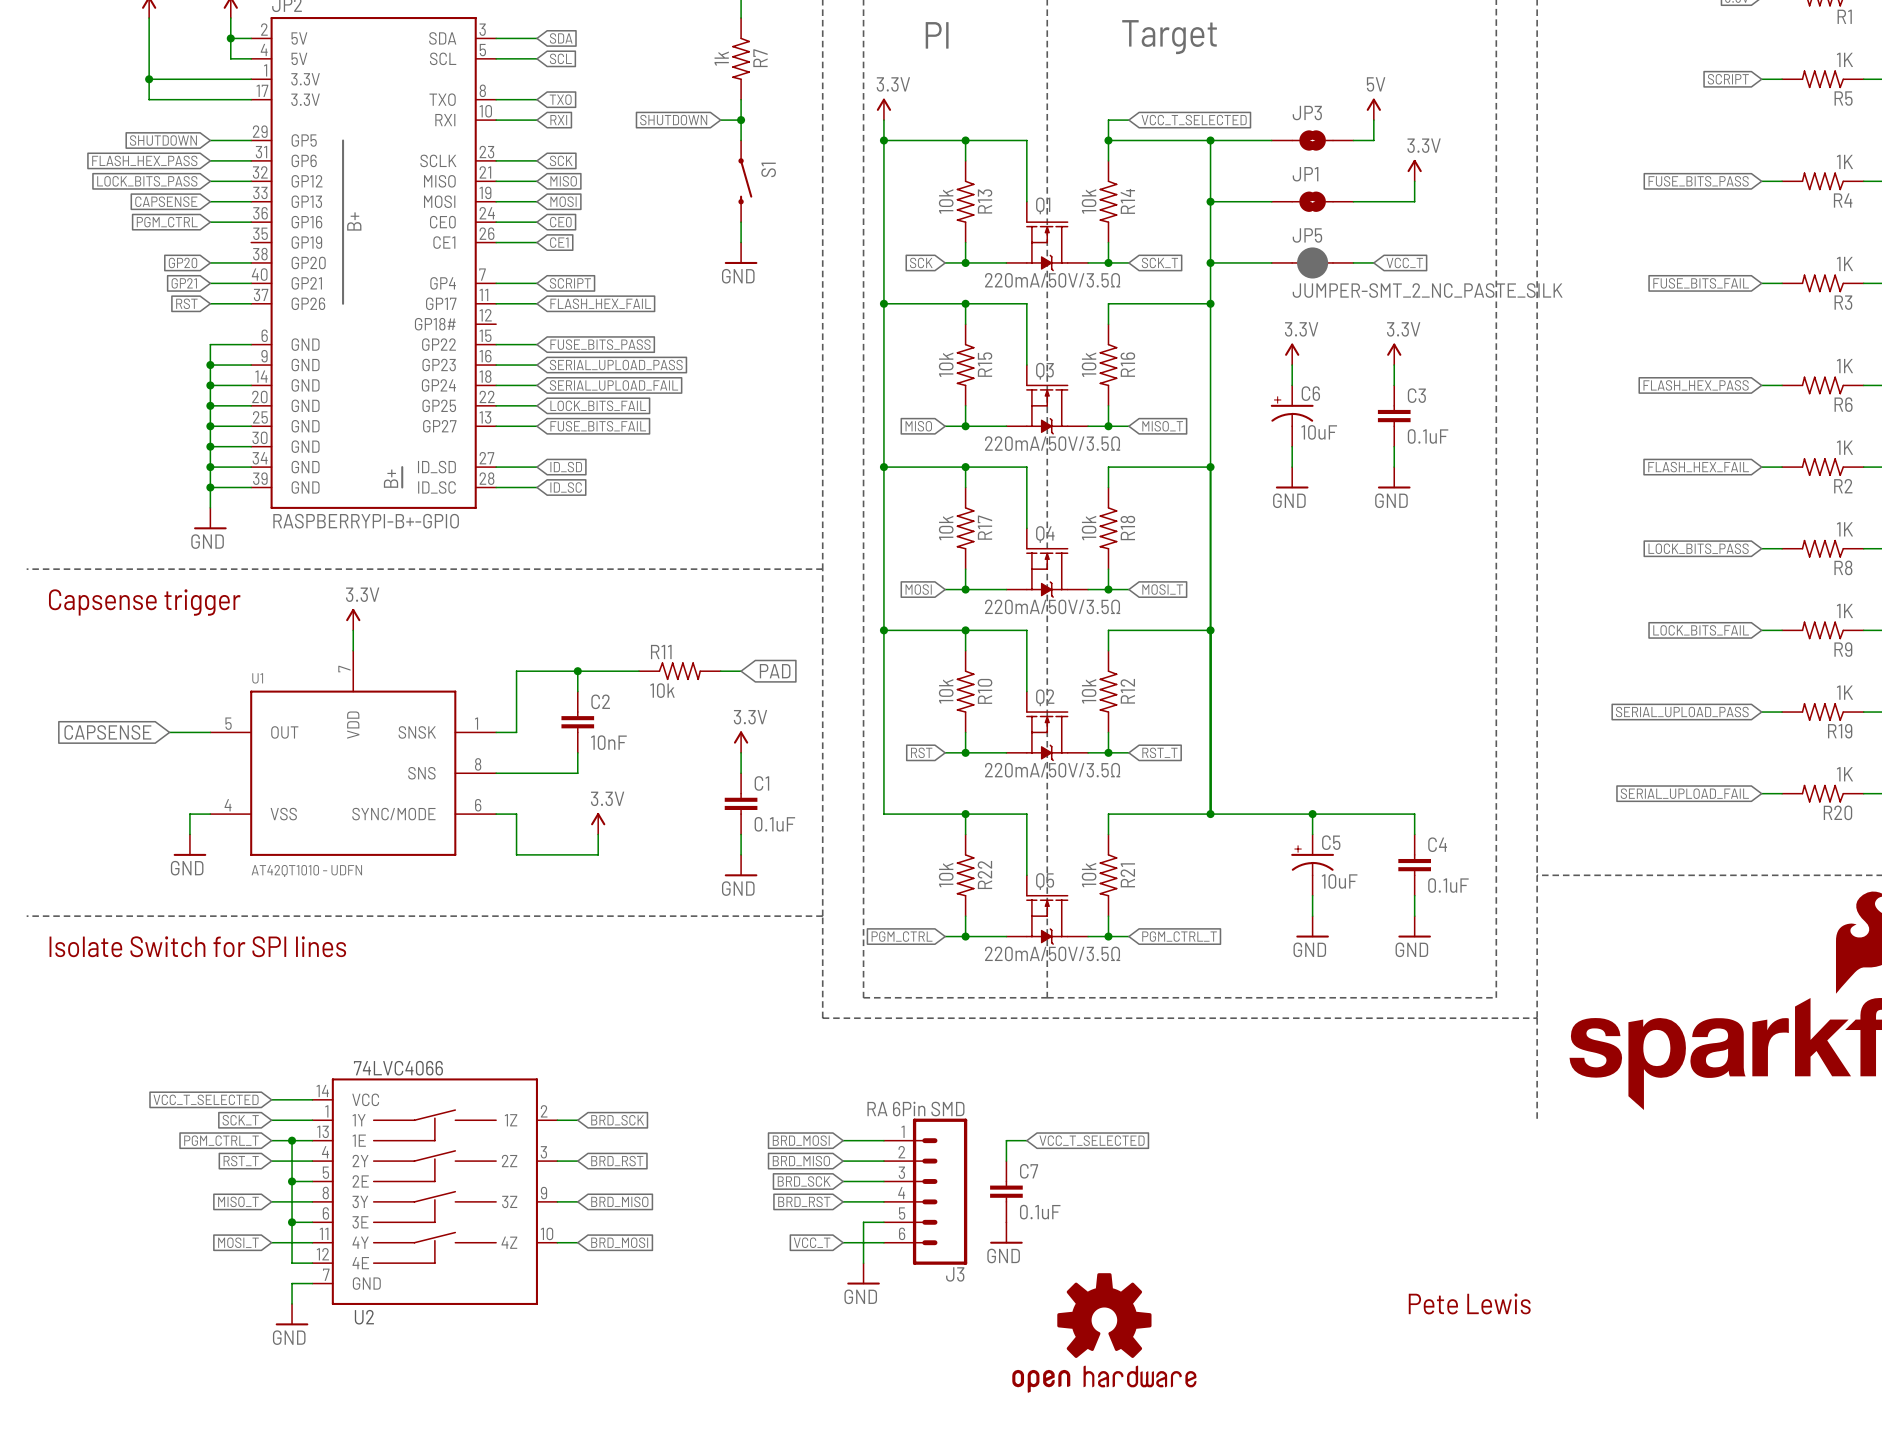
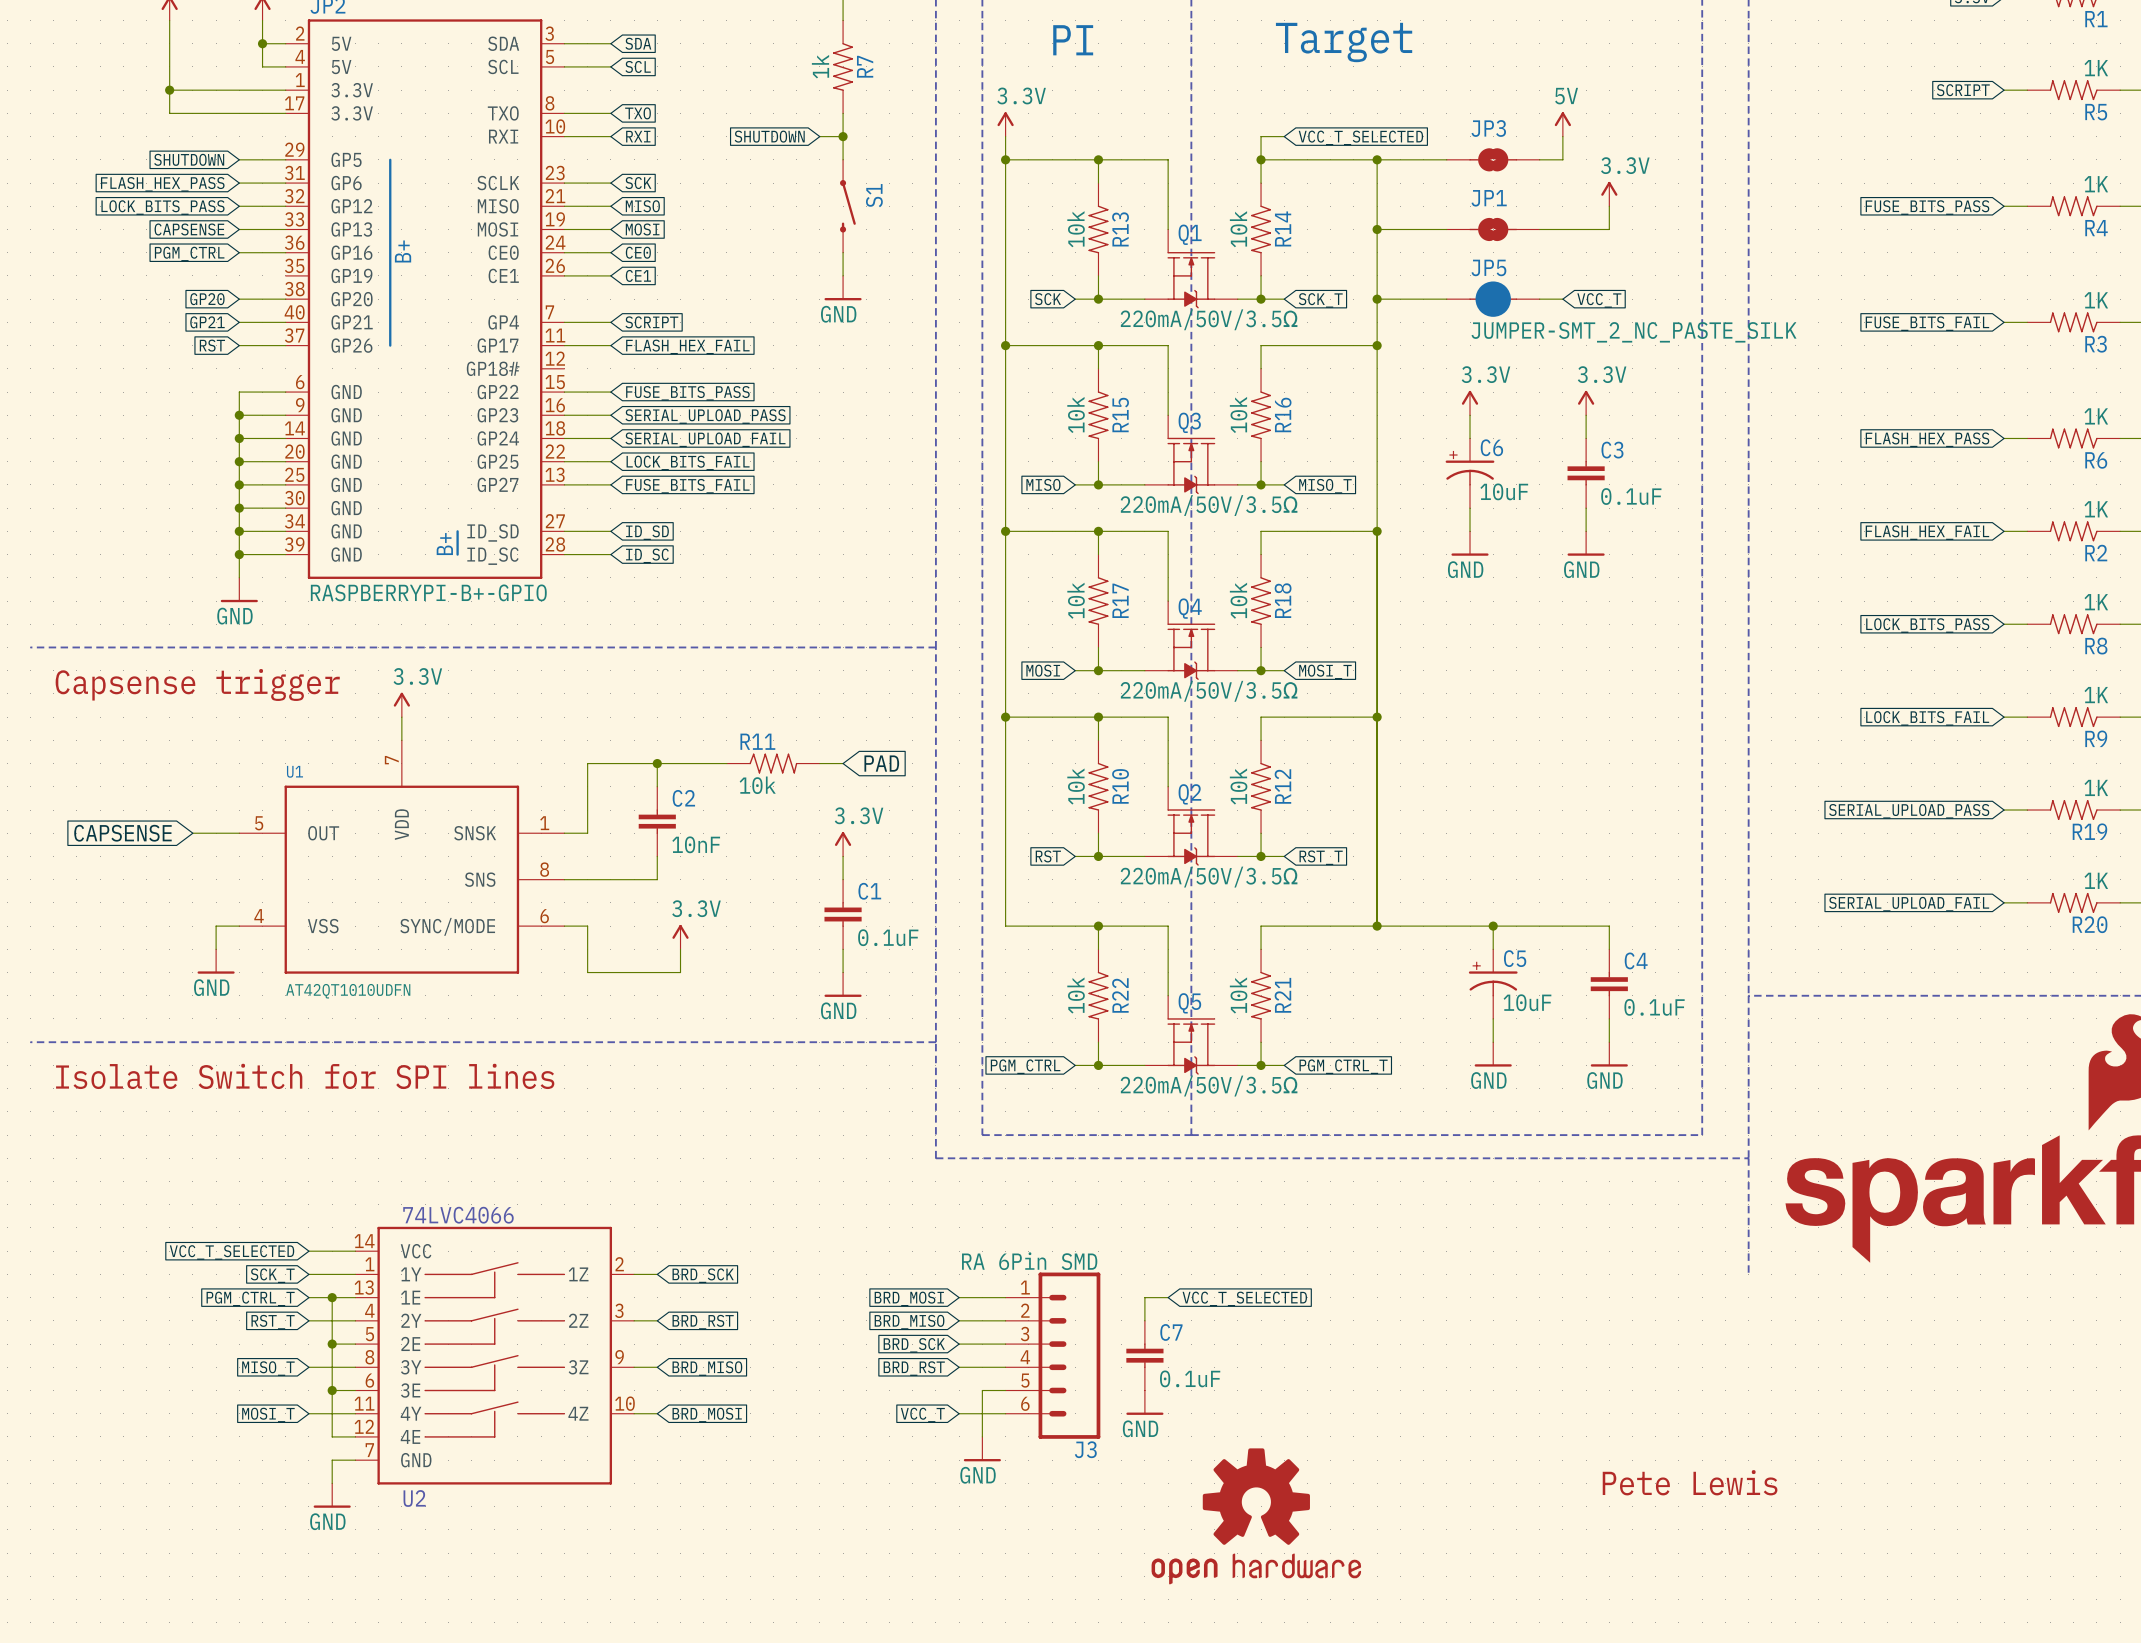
U1 value: AT42QT1010 - UDFN (306, 870) -> AT42QT1010UDFN (348, 991)

